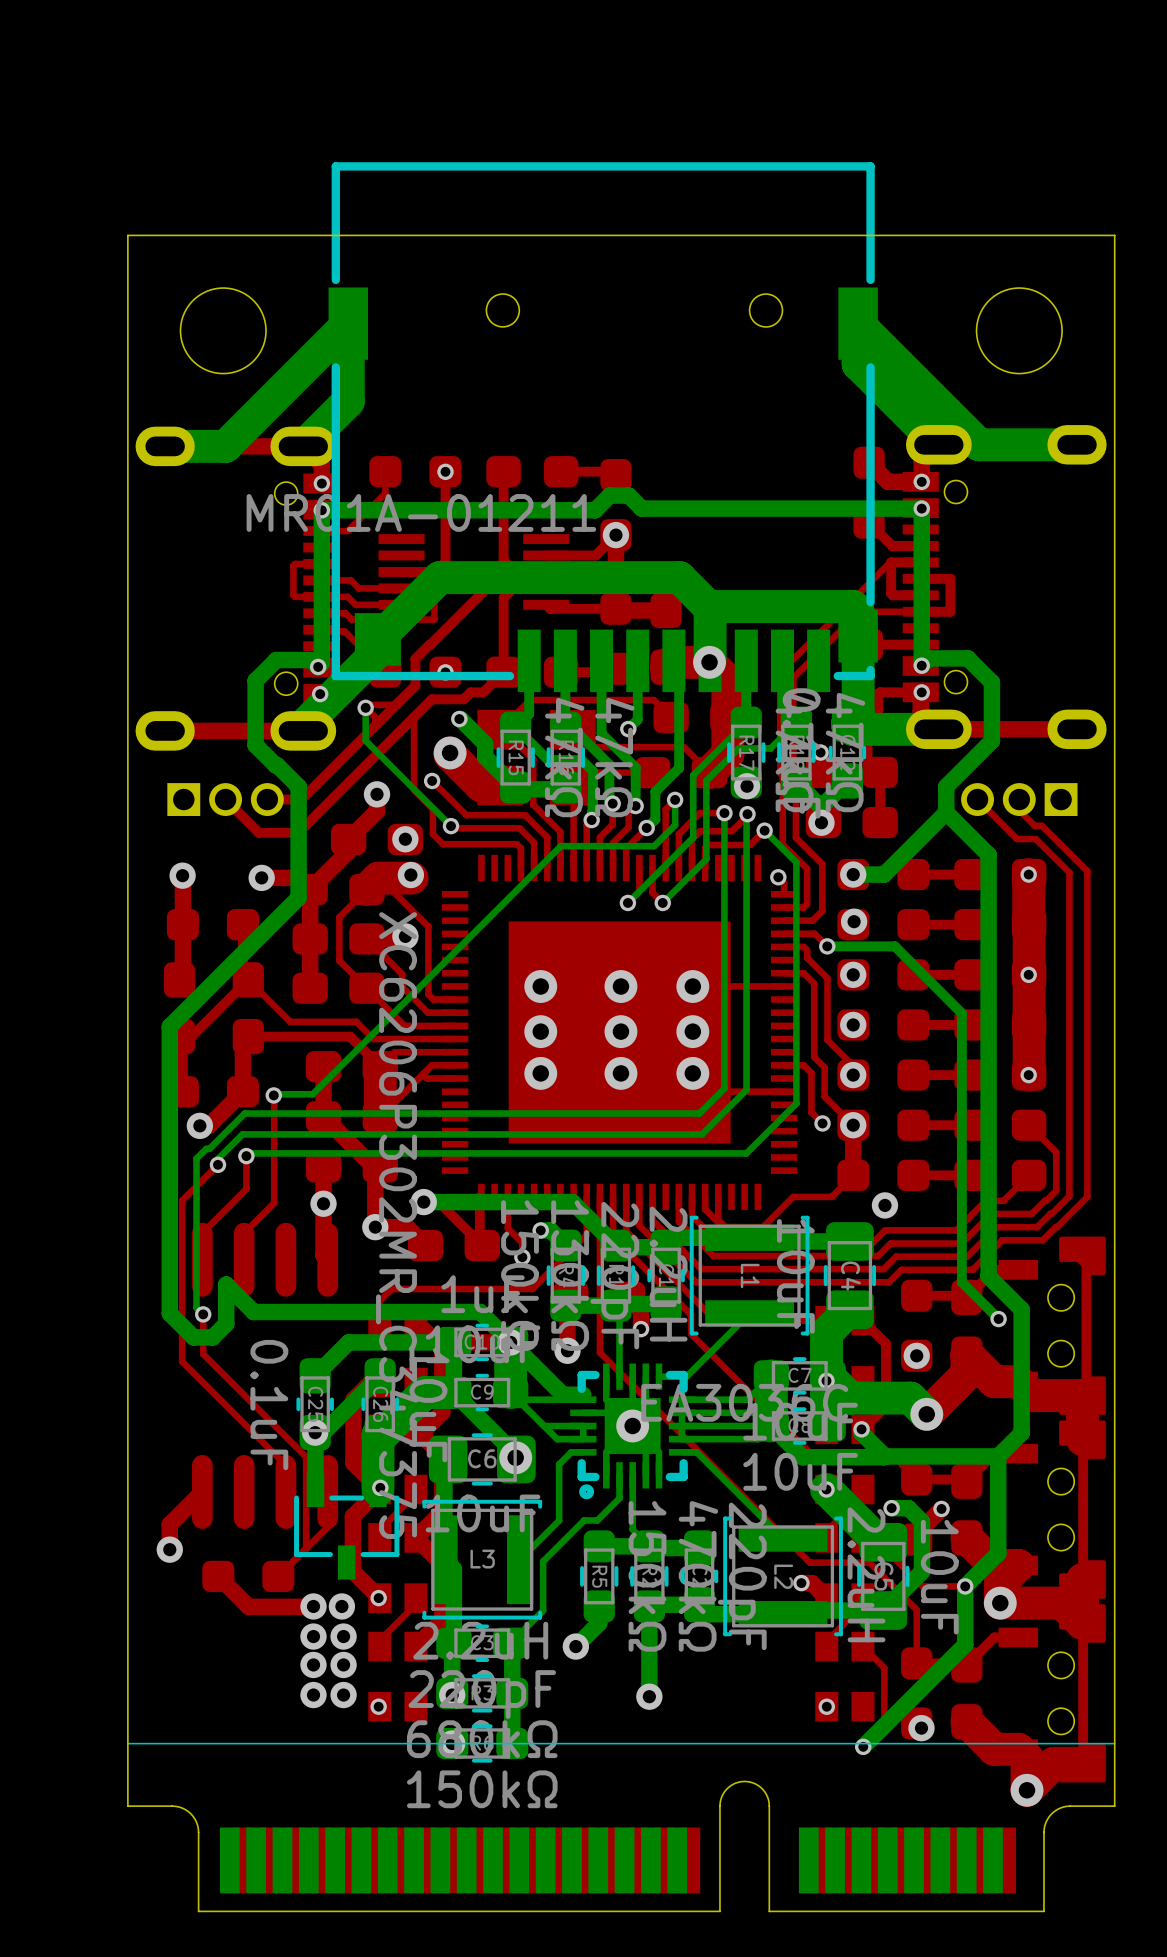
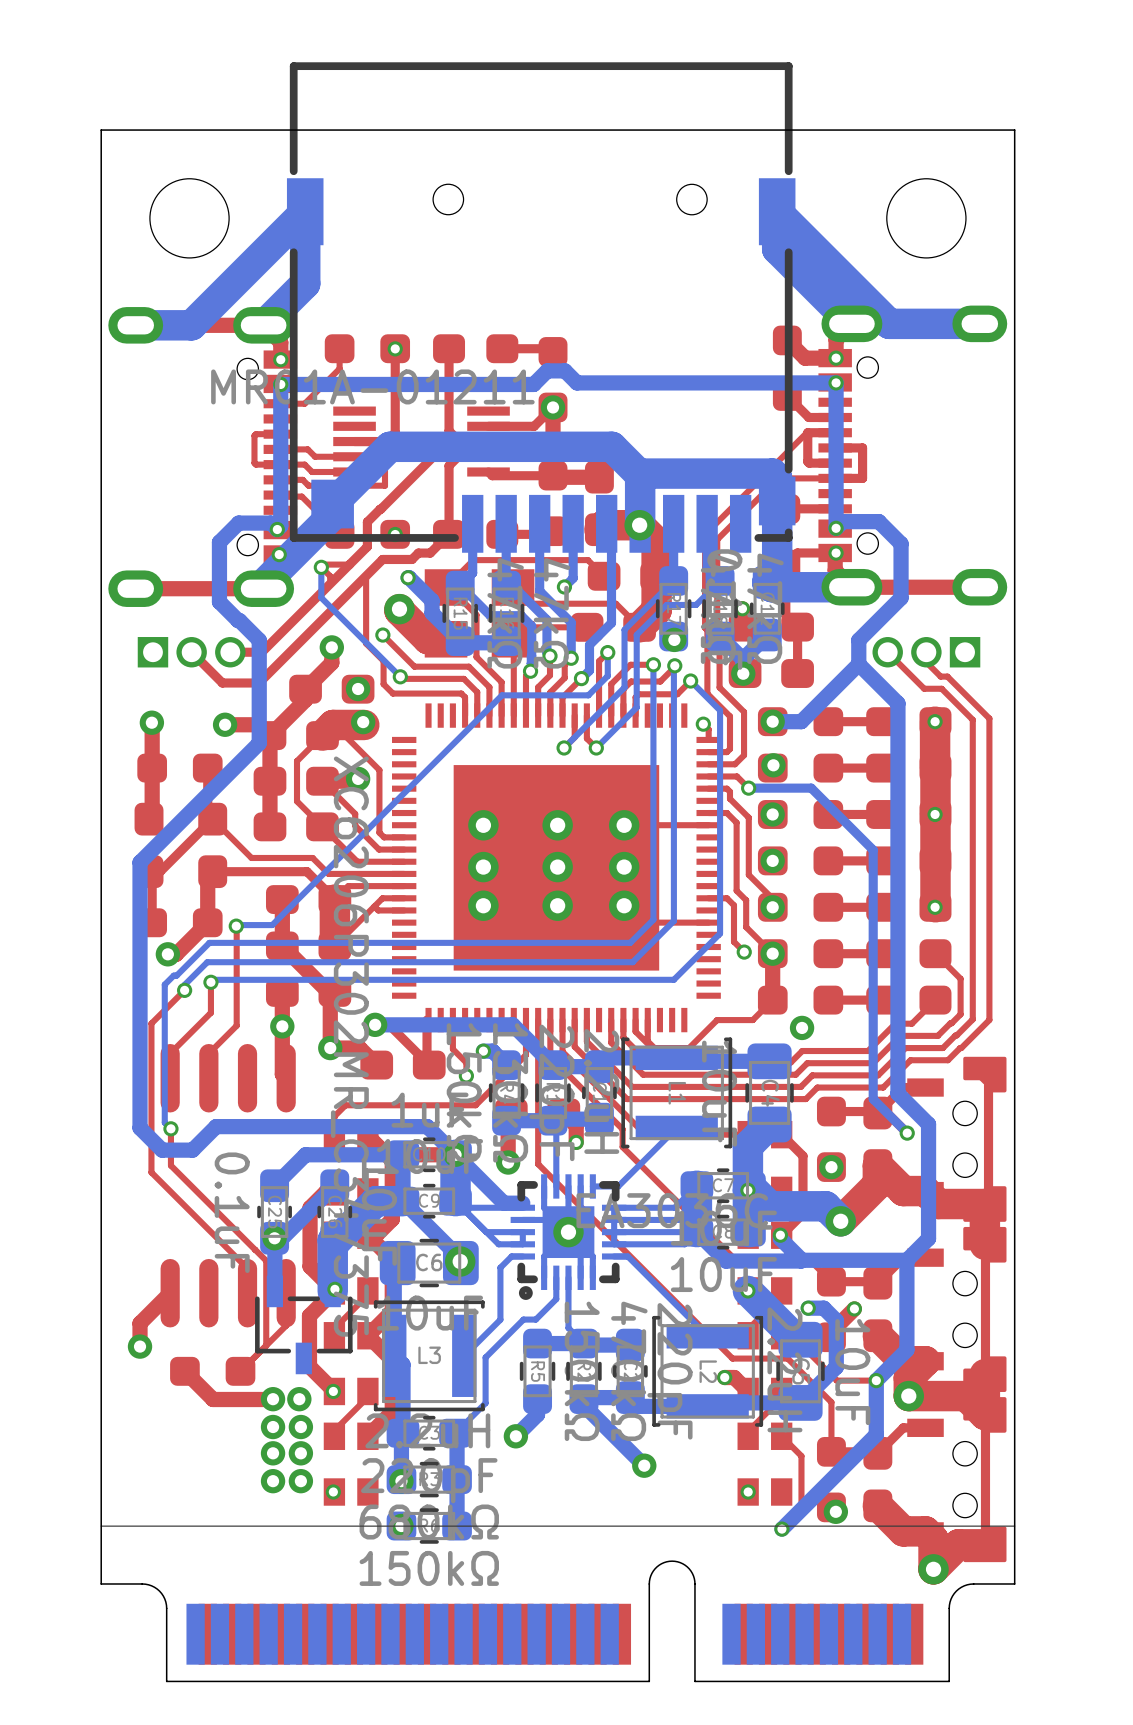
bottom track: (253, 1312) (226, 1284) (226, 1323) (212, 1337) -> (217, 1126) (192, 1150) (179, 1150)
bottom track: (649, 1613) (649, 1696) -> (583, 1405) (644, 1465)
via position: (649, 1696) -> (644, 1465)

